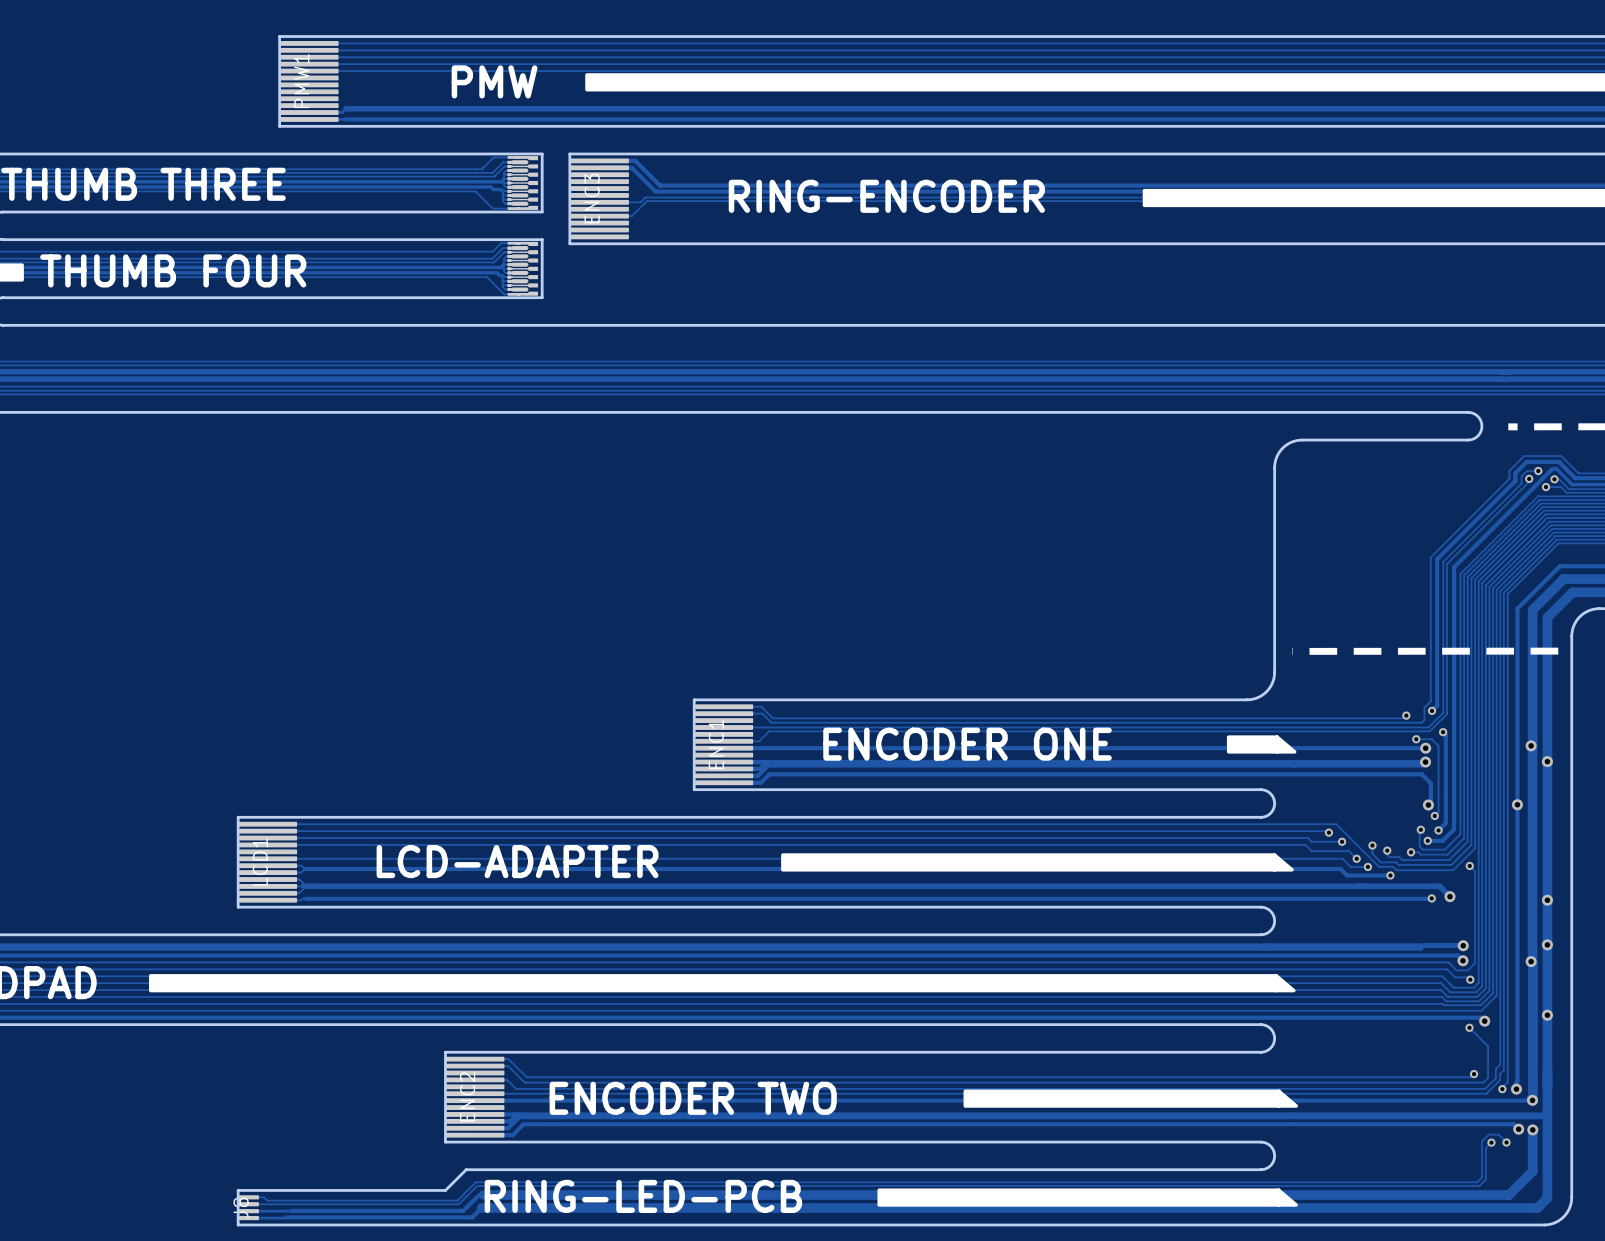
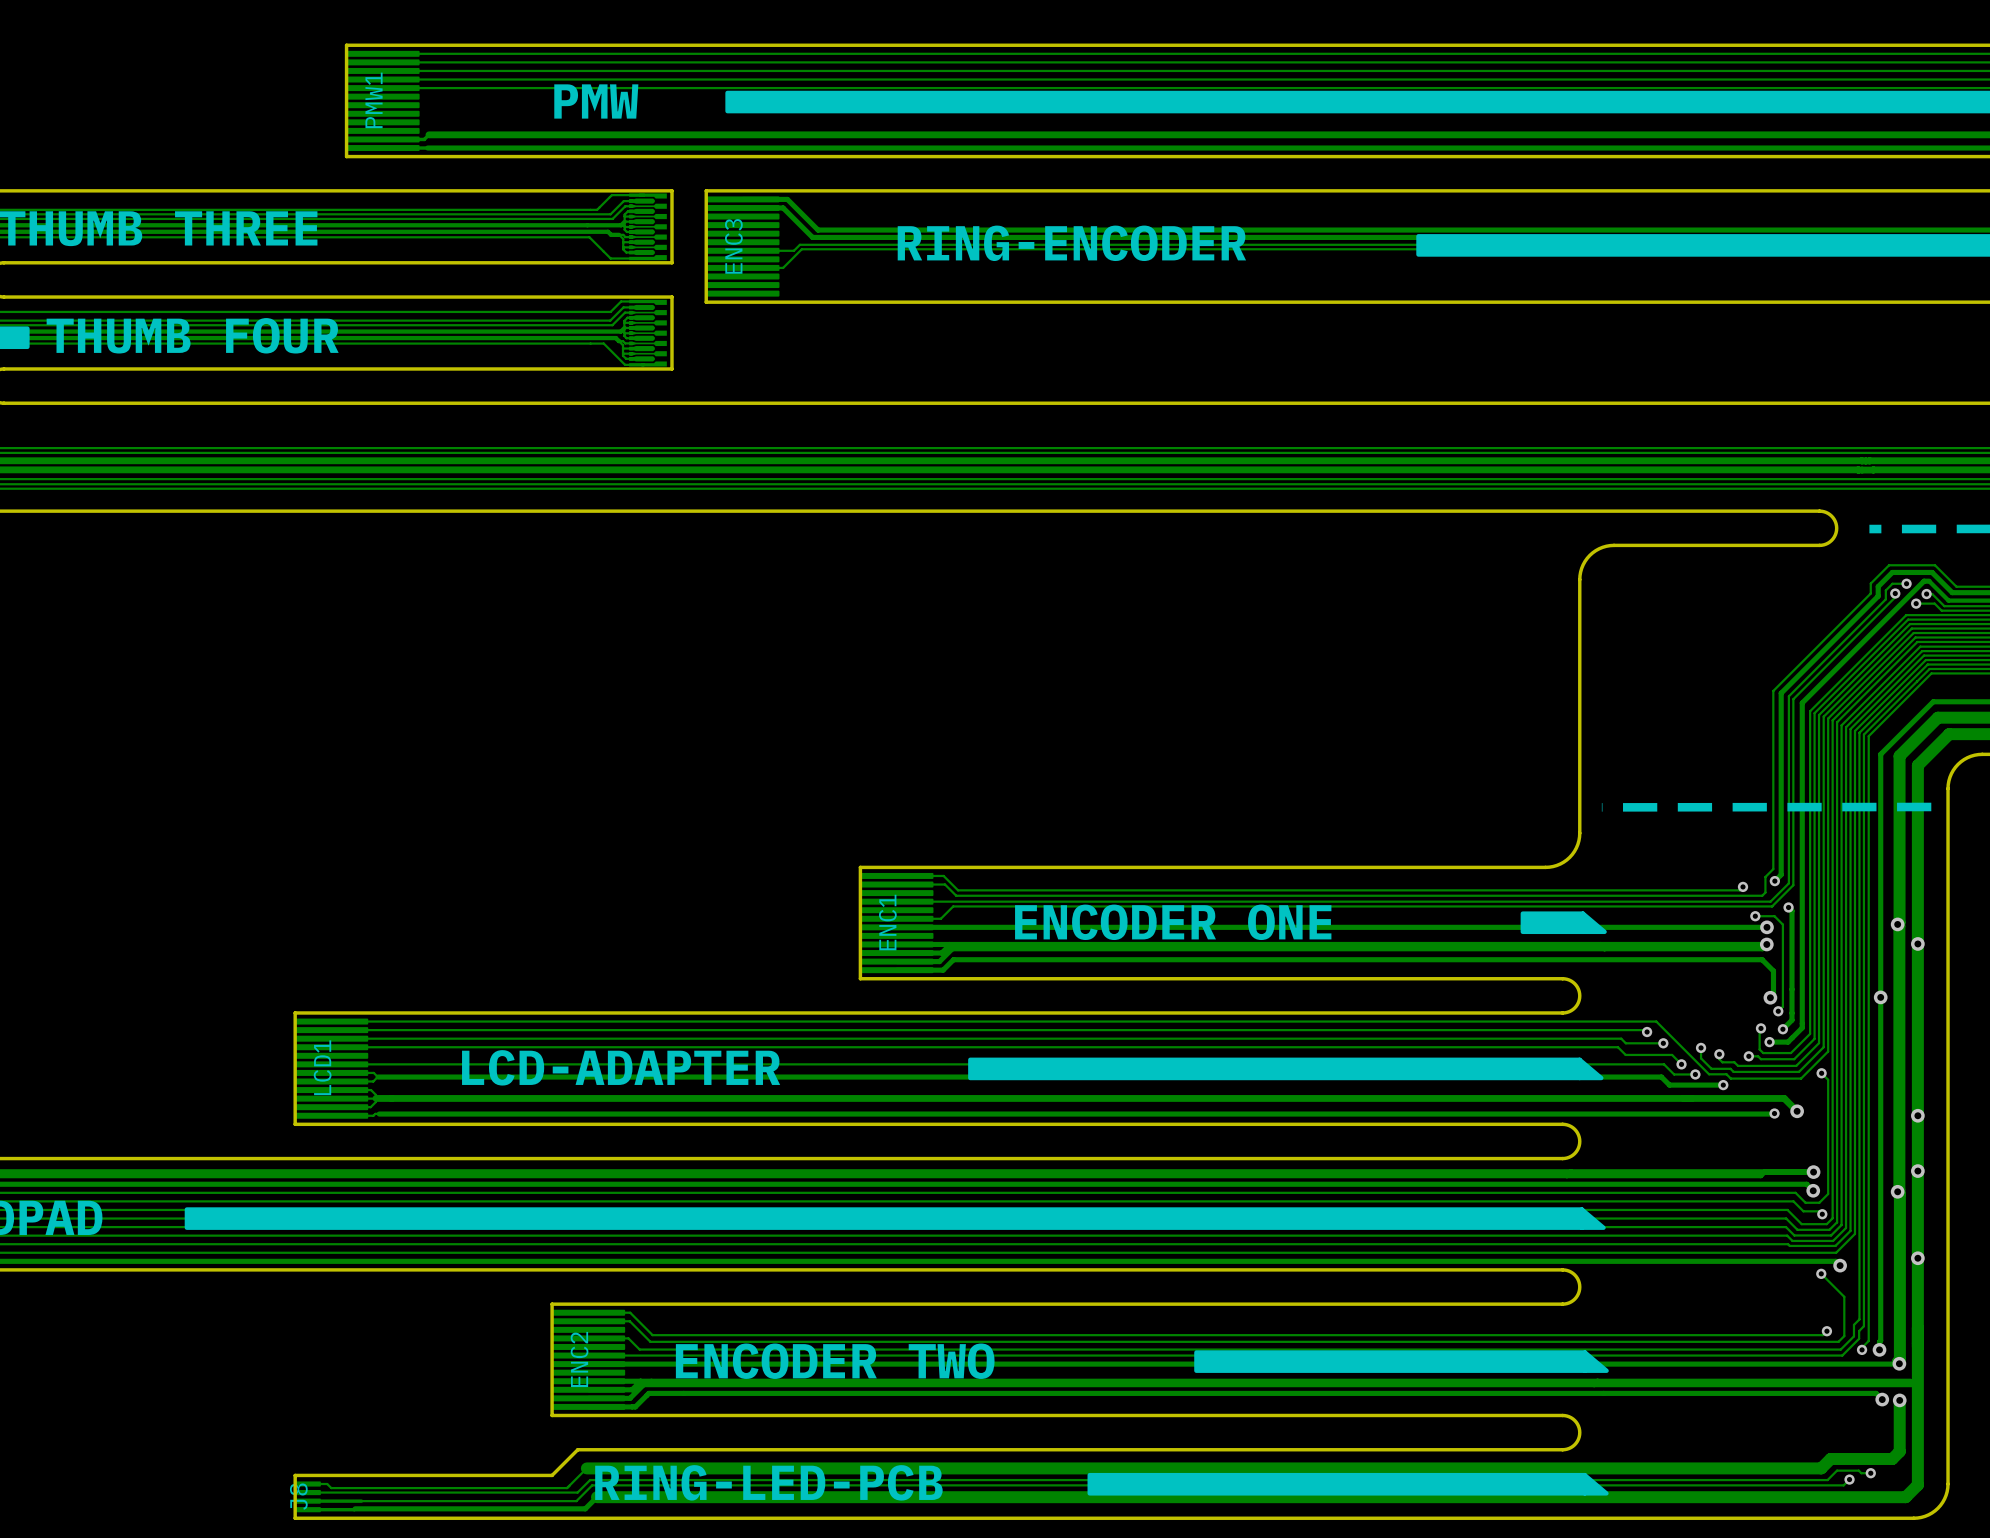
track: (1491, 1142) (1485, 1148) (1485, 1179) (1479, 1185) (477, 1185) (459, 1204) -> (1870, 1473) (1861, 1473) (1858, 1470) (1837, 1470) (1827, 1480) (590, 1480) (577, 1492) (568, 1492)
via: (1491, 1142) -> none
track: (1506, 1142) (1498, 1134) (1488, 1134) (1482, 1141) (1482, 1177) (1477, 1182) (475, 1182) -> none
via: (1506, 1142) -> none
track: (1526, 1177) (1509, 1195) (479, 1195) (463, 1210) (291, 1211) -> (1849, 1479) (1843, 1485) (592, 1485) (576, 1501) (361, 1501)
track: none -> (1892, 1458) (1830, 1458) (1821, 1468) (586, 1468)
via: none -> (1870, 1473)
via: none -> (1849, 1479)

